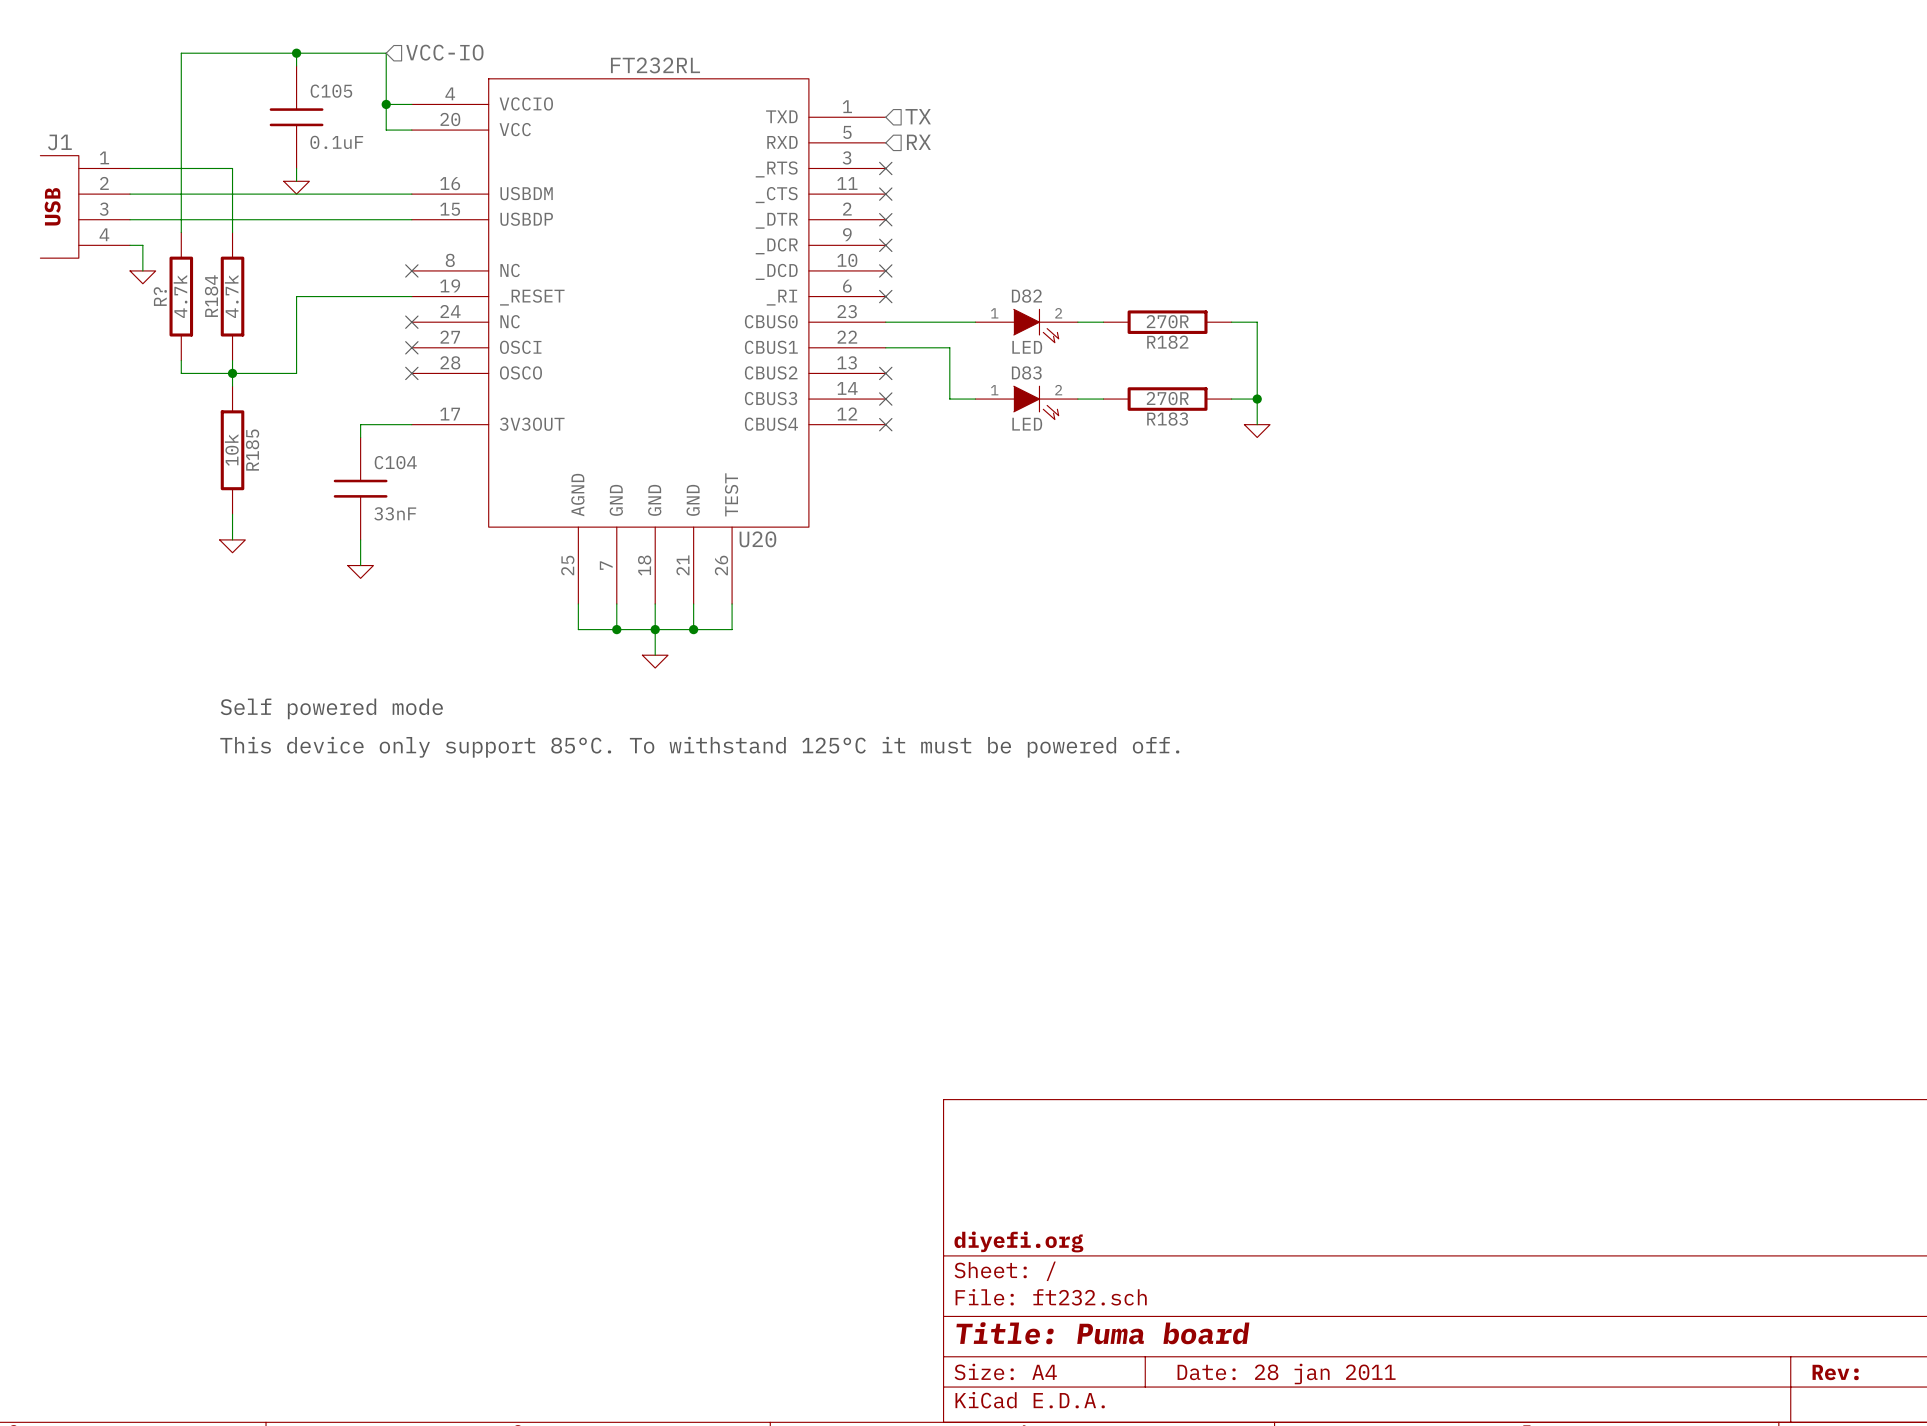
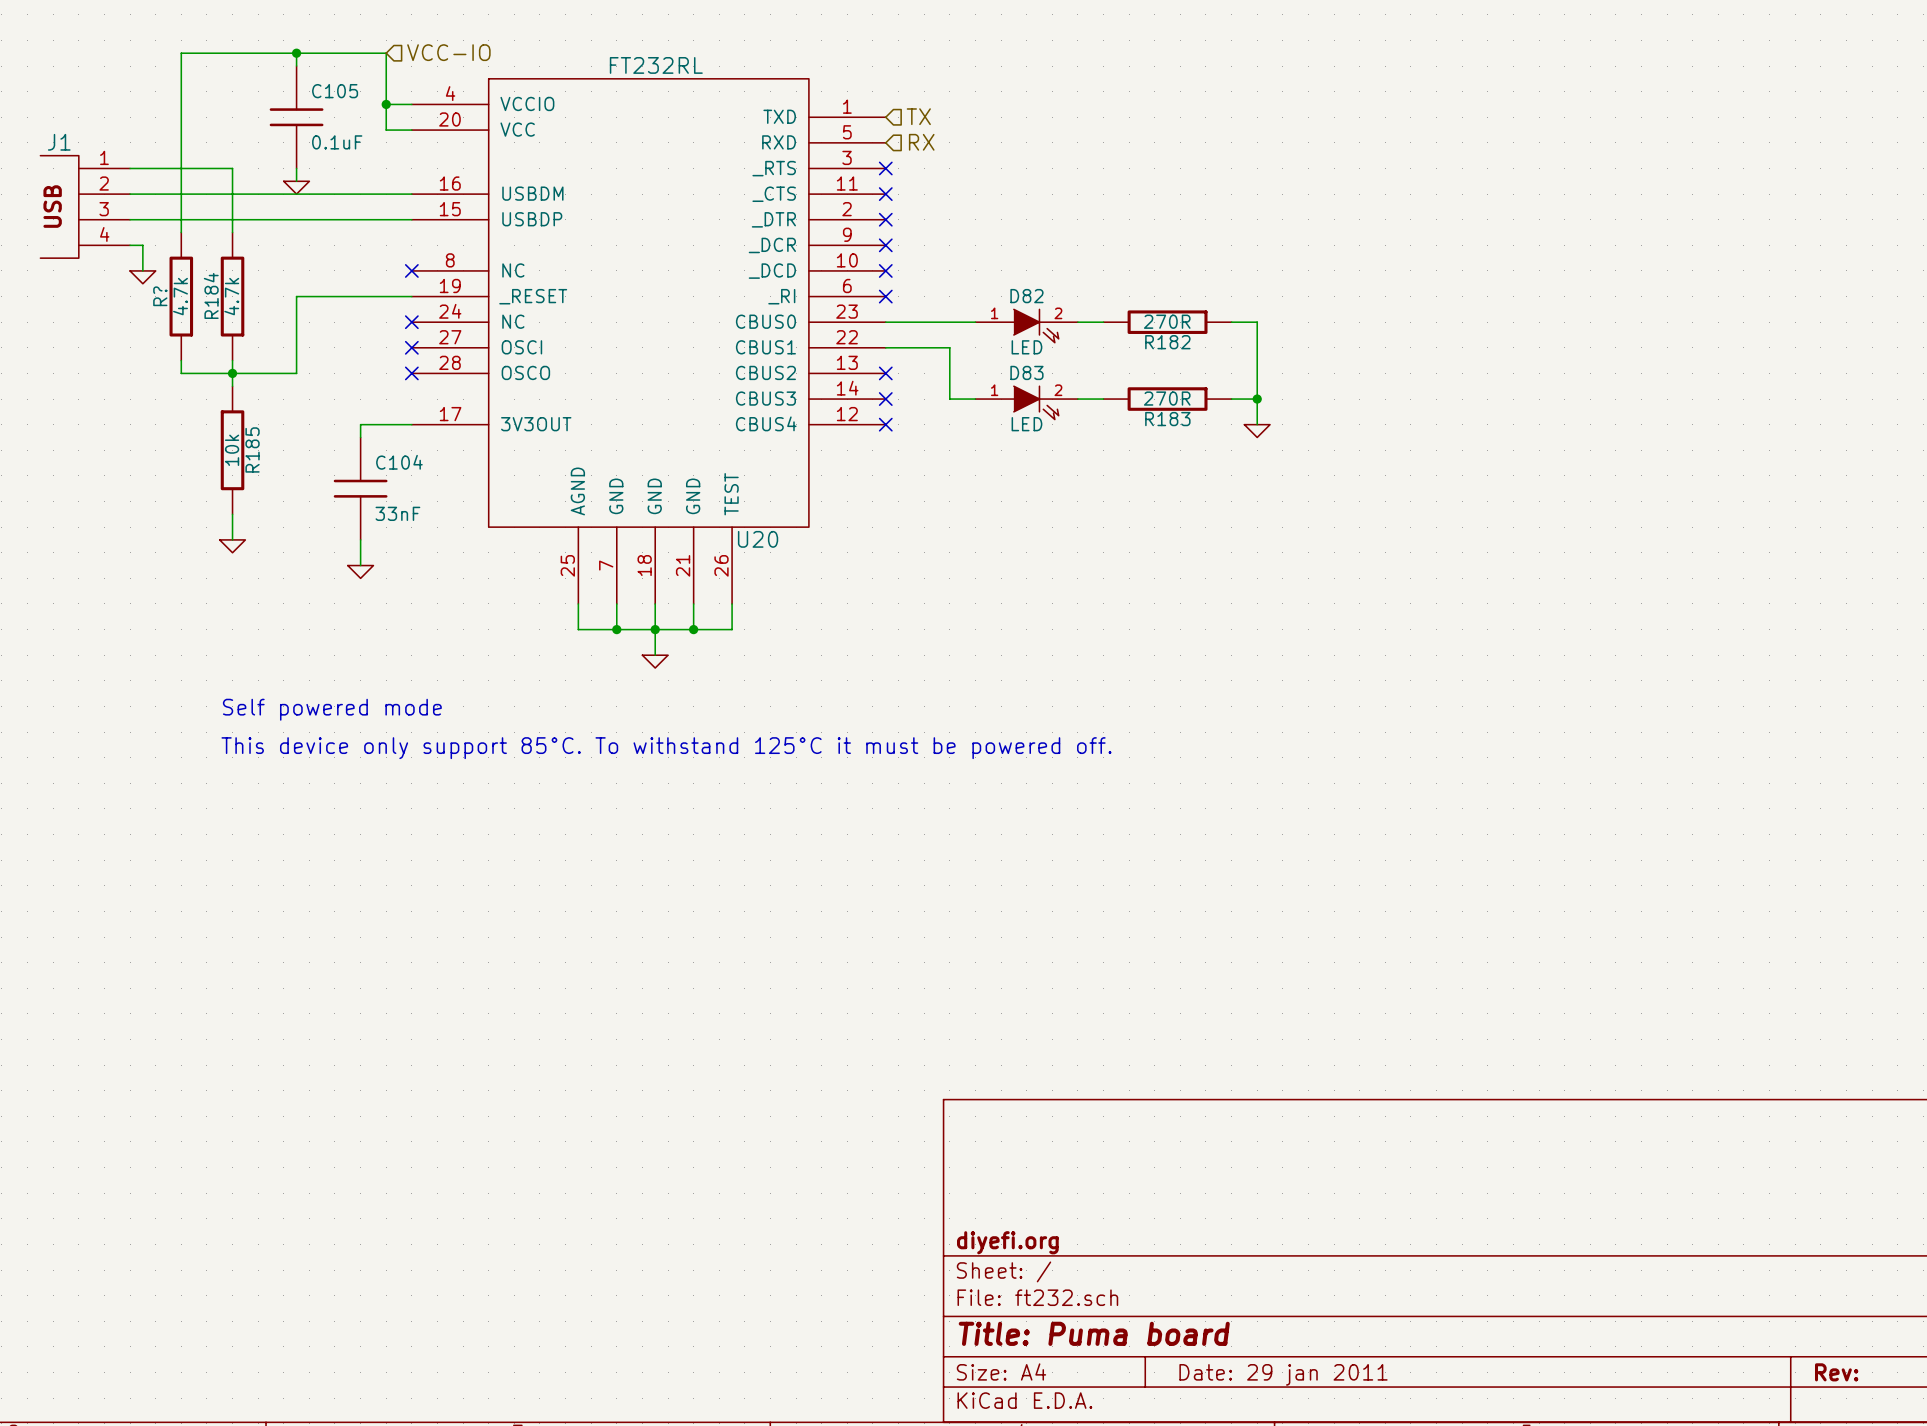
title block: Date: 28 jan 2011 (1286, 1373) -> Date: 29 jan 2011 (1283, 1374)

